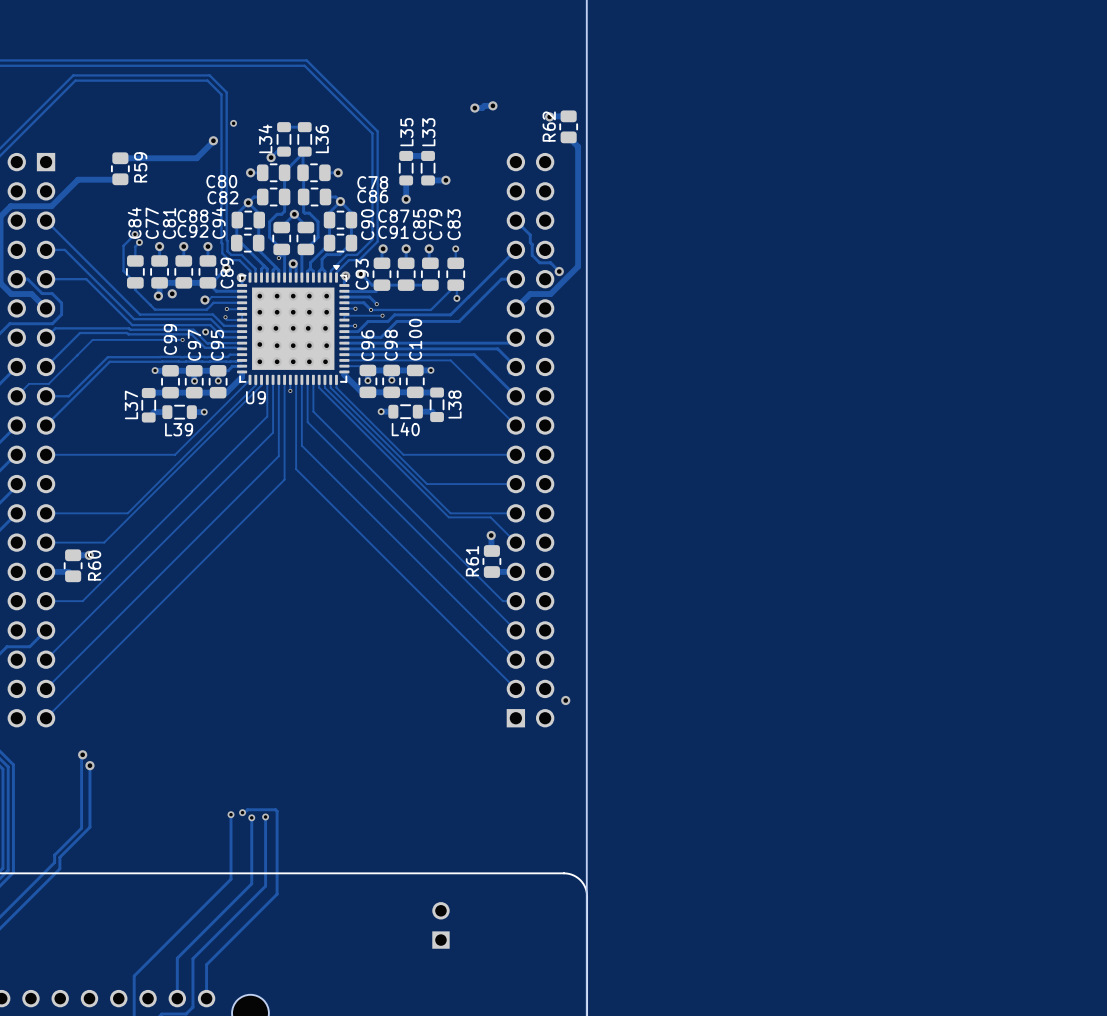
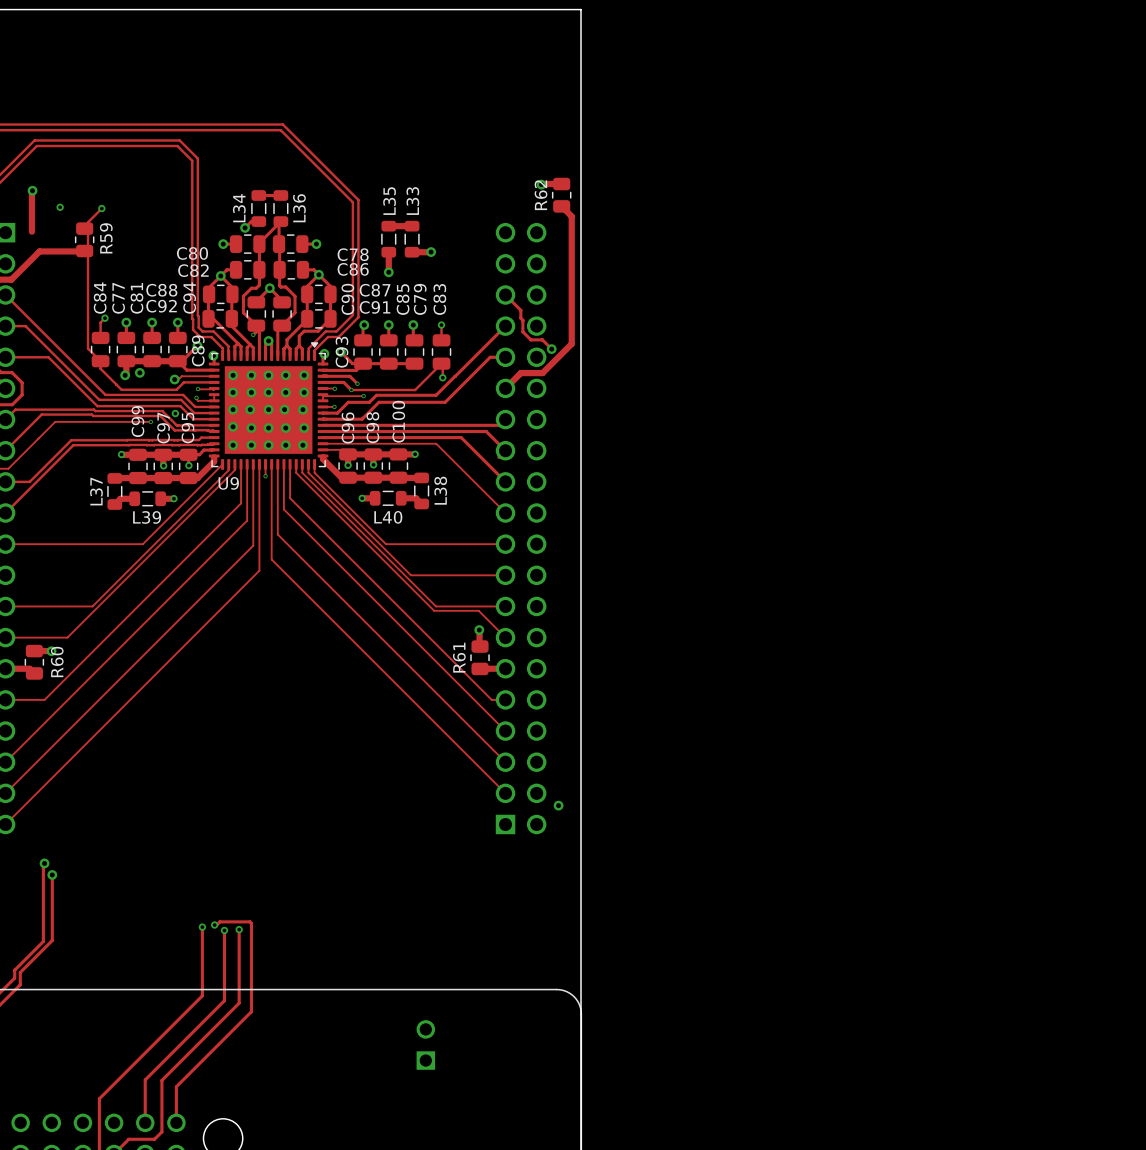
track: (492, 105) (474, 108) -> none
via: (492, 105) -> none
via: (474, 108) -> none
track: none -> (32, 190) (31, 231)
via: none -> (32, 190)
via: (233, 123) -> none
via: none -> (60, 207)
via: none -> (101, 208)
track: (213, 140) (196, 158) (120, 158) -> none
via: (213, 140) -> none
track: (134, 234) (123, 245) -> (101, 208) (88, 222) (88, 321)
via: (134, 234) -> none

